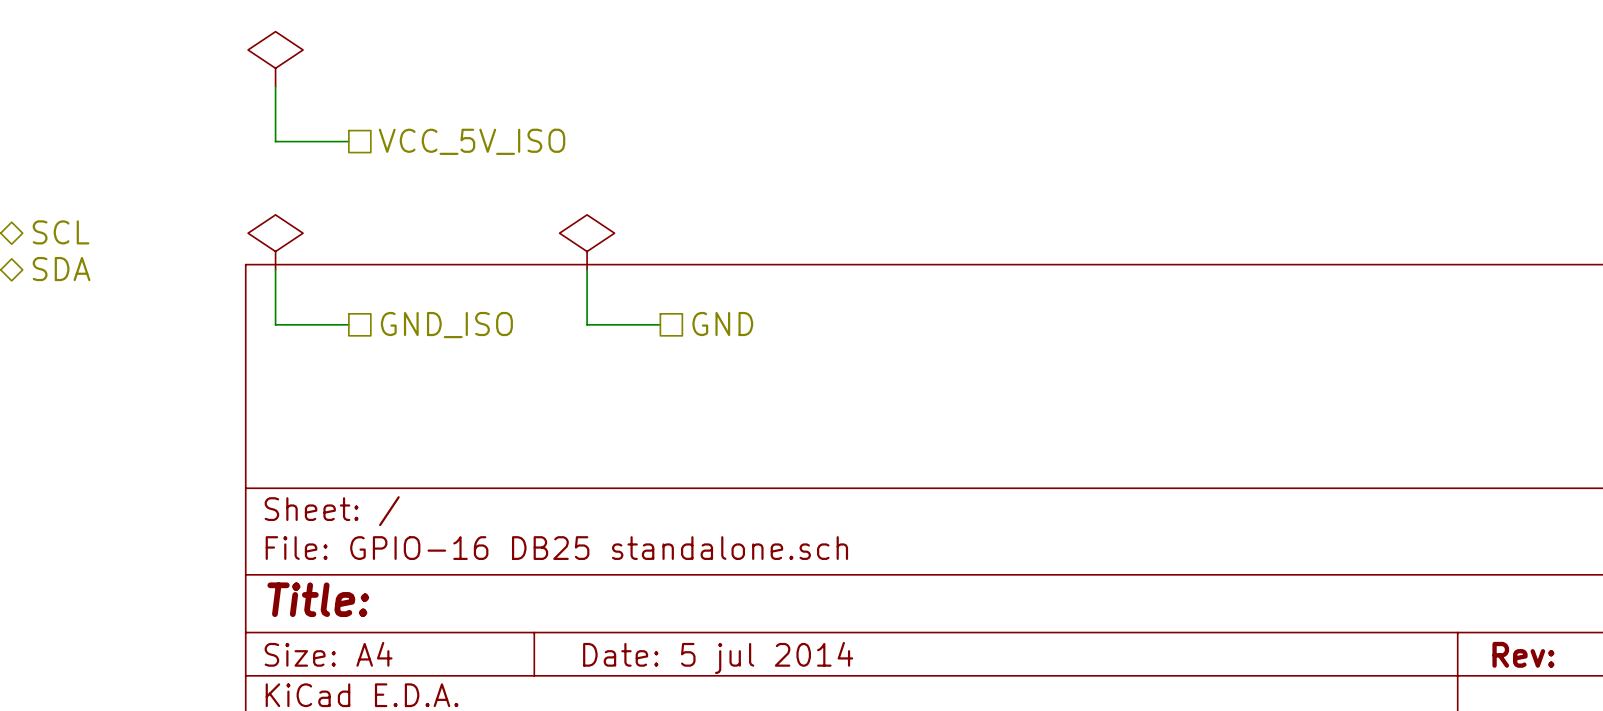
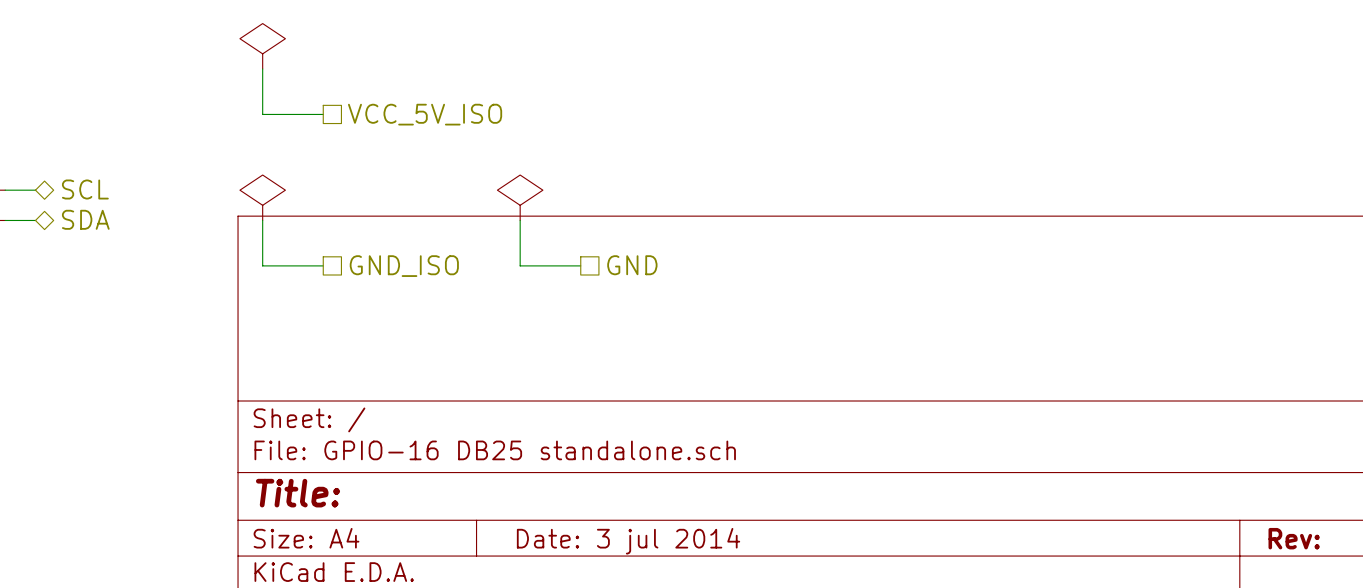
title block: Date: 5 jul 2014 (718, 657) -> Date: 3 jul 2014 (628, 541)

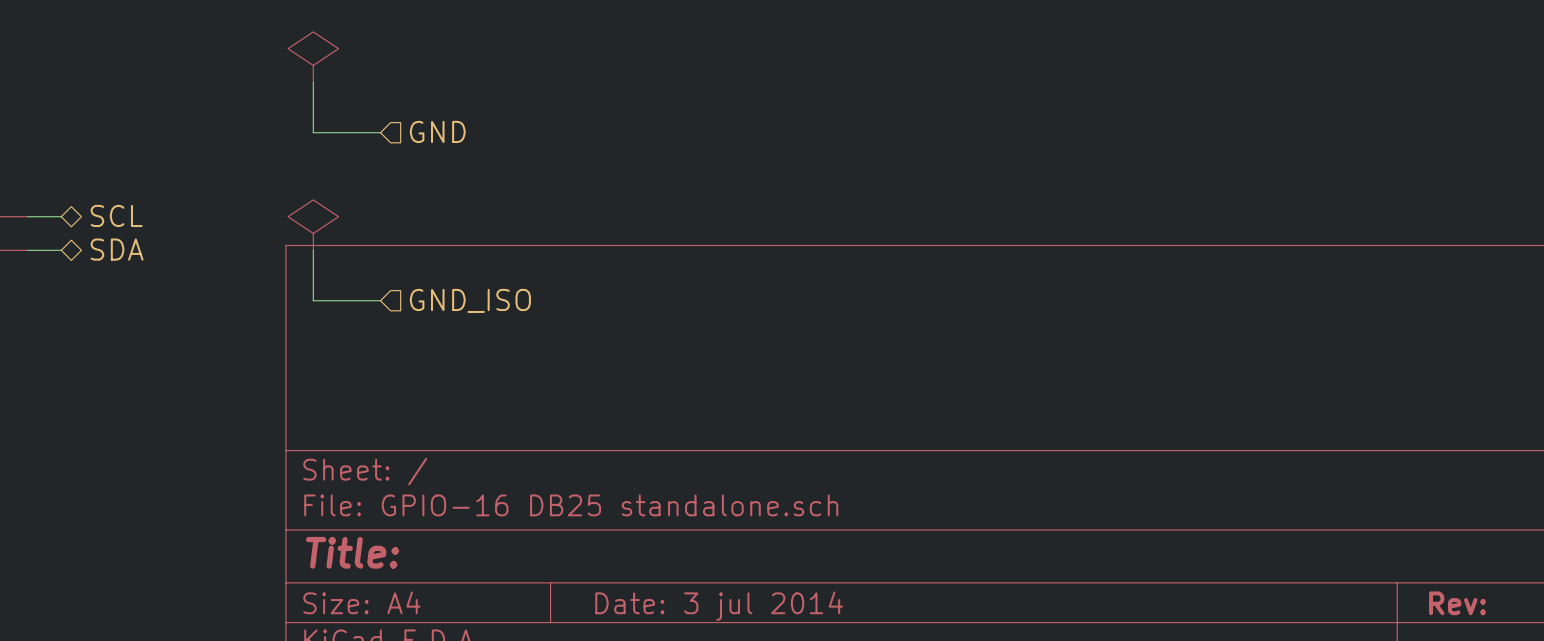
hierarchical label shape: passive (425, 114) -> input (437, 131)
hierarchical label: VCC_5V_ISO (425, 114) -> GND (437, 131)
power symbol: (520, 197) -> none
wire: (520, 220) (520, 265) (580, 265) -> none
hierarchical label: GND (632, 265) -> none
hierarchical label shape: passive (404, 266) -> input (470, 300)

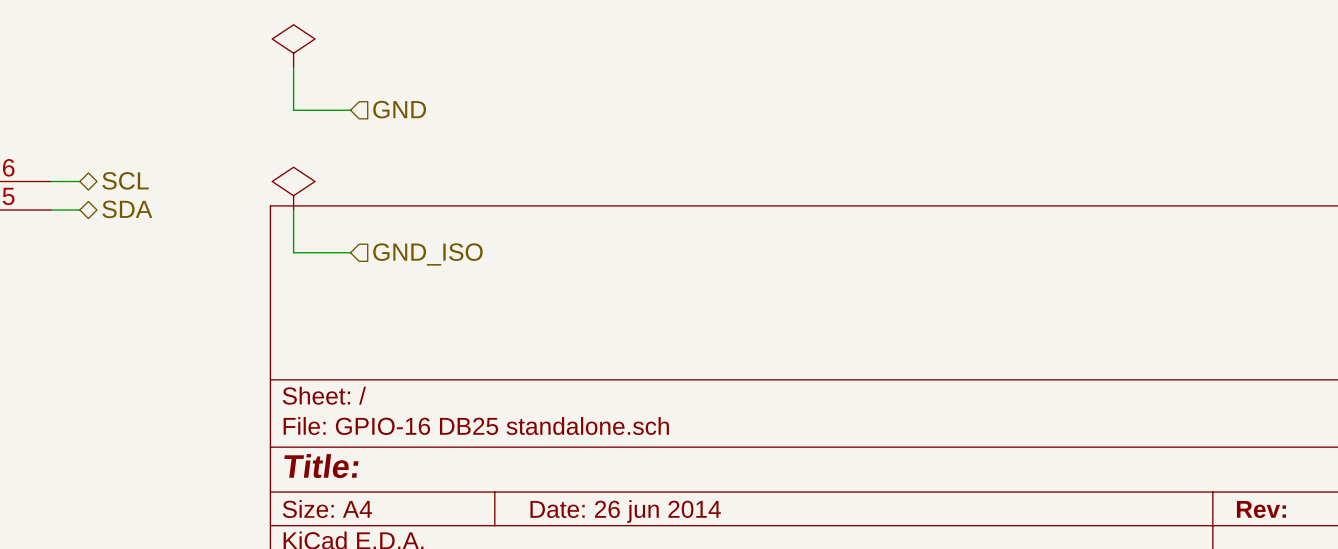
title block: Date: 3 jul 2014 (719, 606) -> Date: 26 jun 2014 (625, 511)

